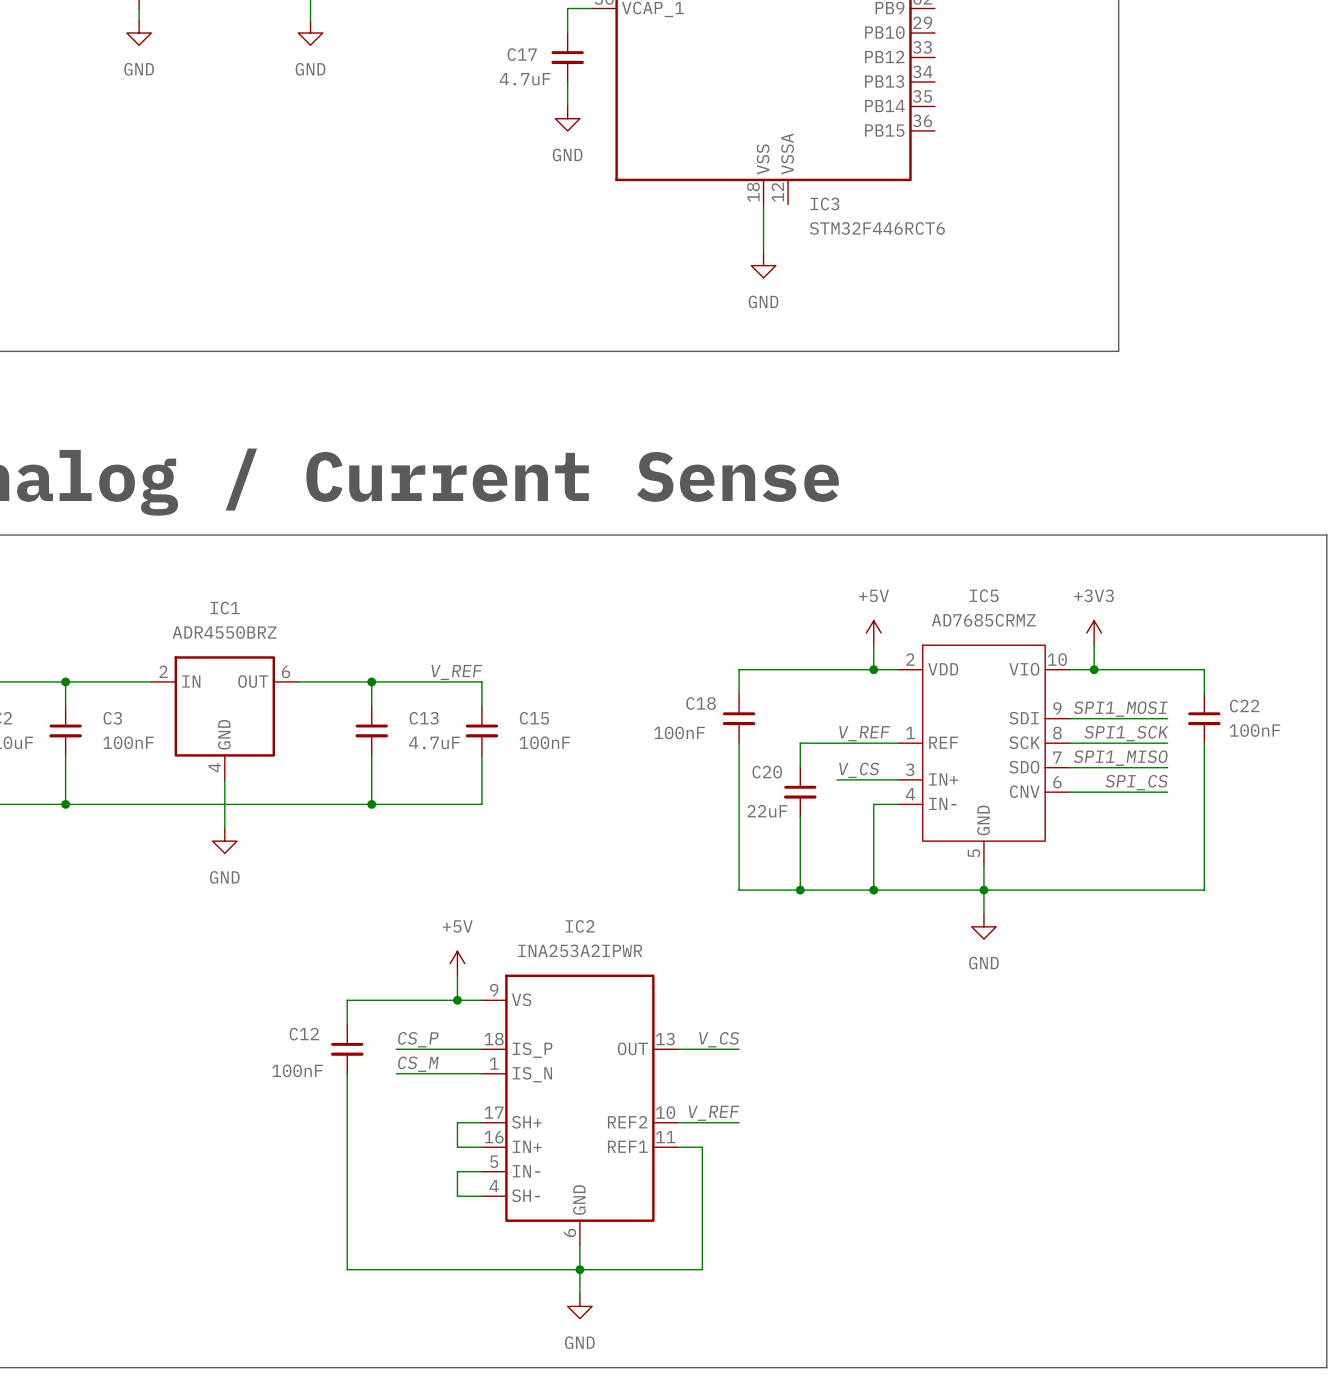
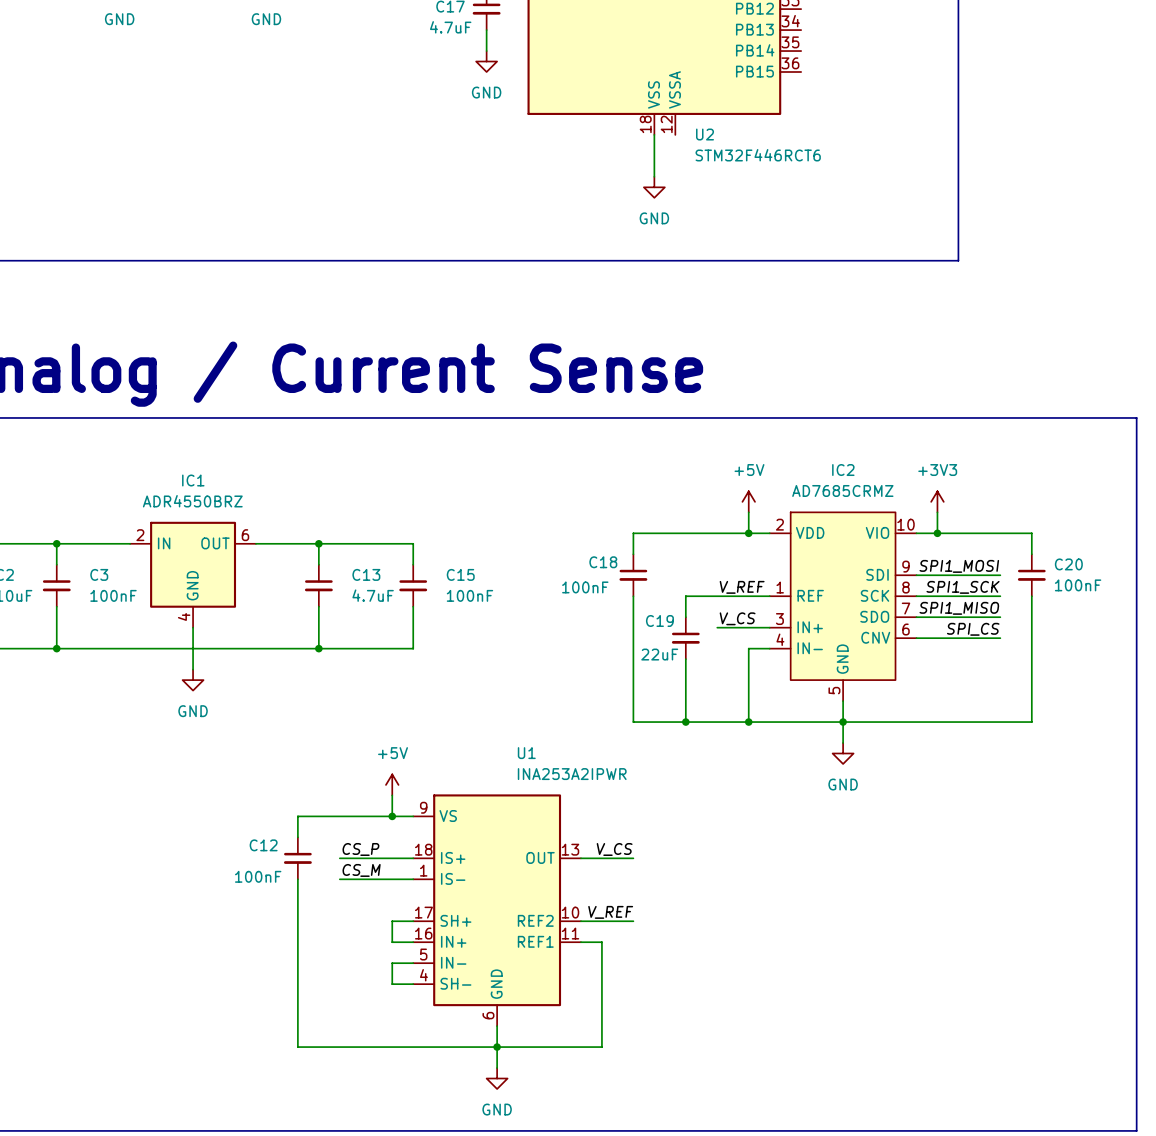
IC3 name: IC3 (825, 203) -> U2 (705, 134)
IC5 name: IC5 (984, 595) -> IC2 (843, 470)
label: V_REF (456, 672) -> none
C22 name: C22 (1244, 706) -> C20 (1068, 564)
C20 name: C20 (767, 772) -> C19 (659, 620)
IC2 name: IC2 (580, 926) -> U1 (526, 753)
IC2 value position: INA253A2IPWR (580, 950) -> INA253A2IPWR (572, 774)
IC2 pin name: IS_P (532, 1050) -> IS+ (453, 857)
IC2 pin name: IS_N (532, 1074) -> IS- (453, 878)

